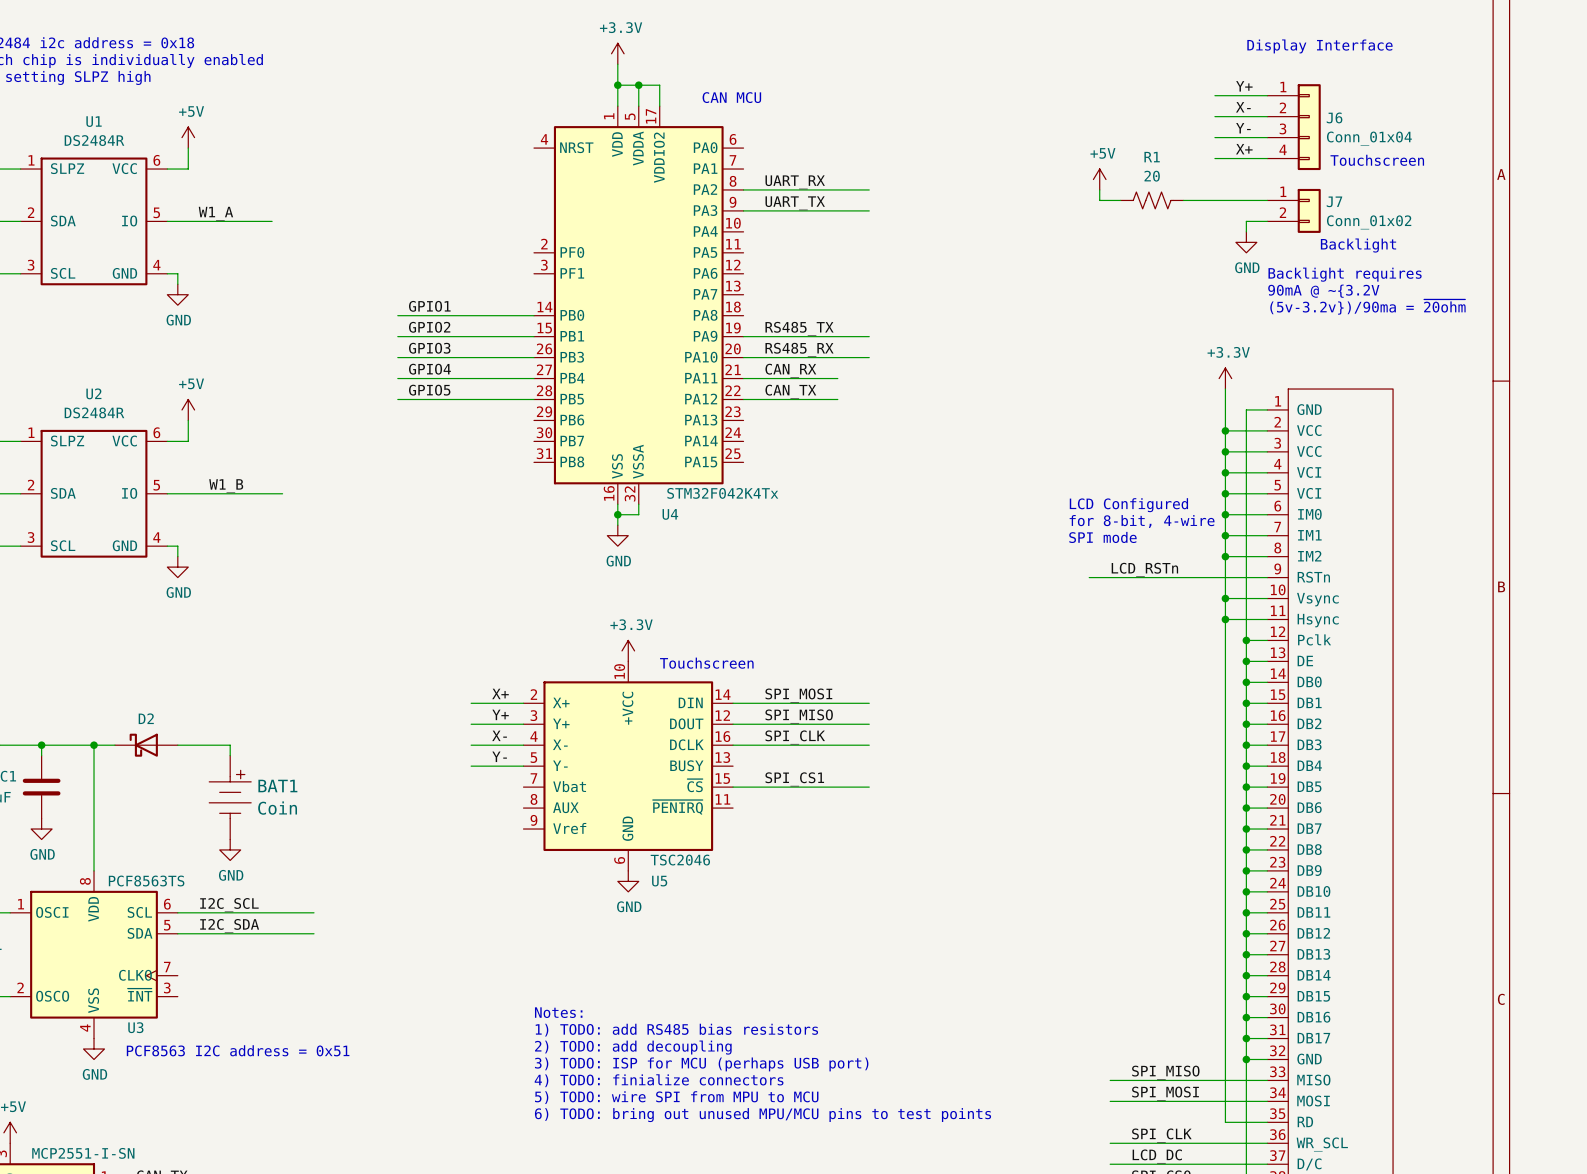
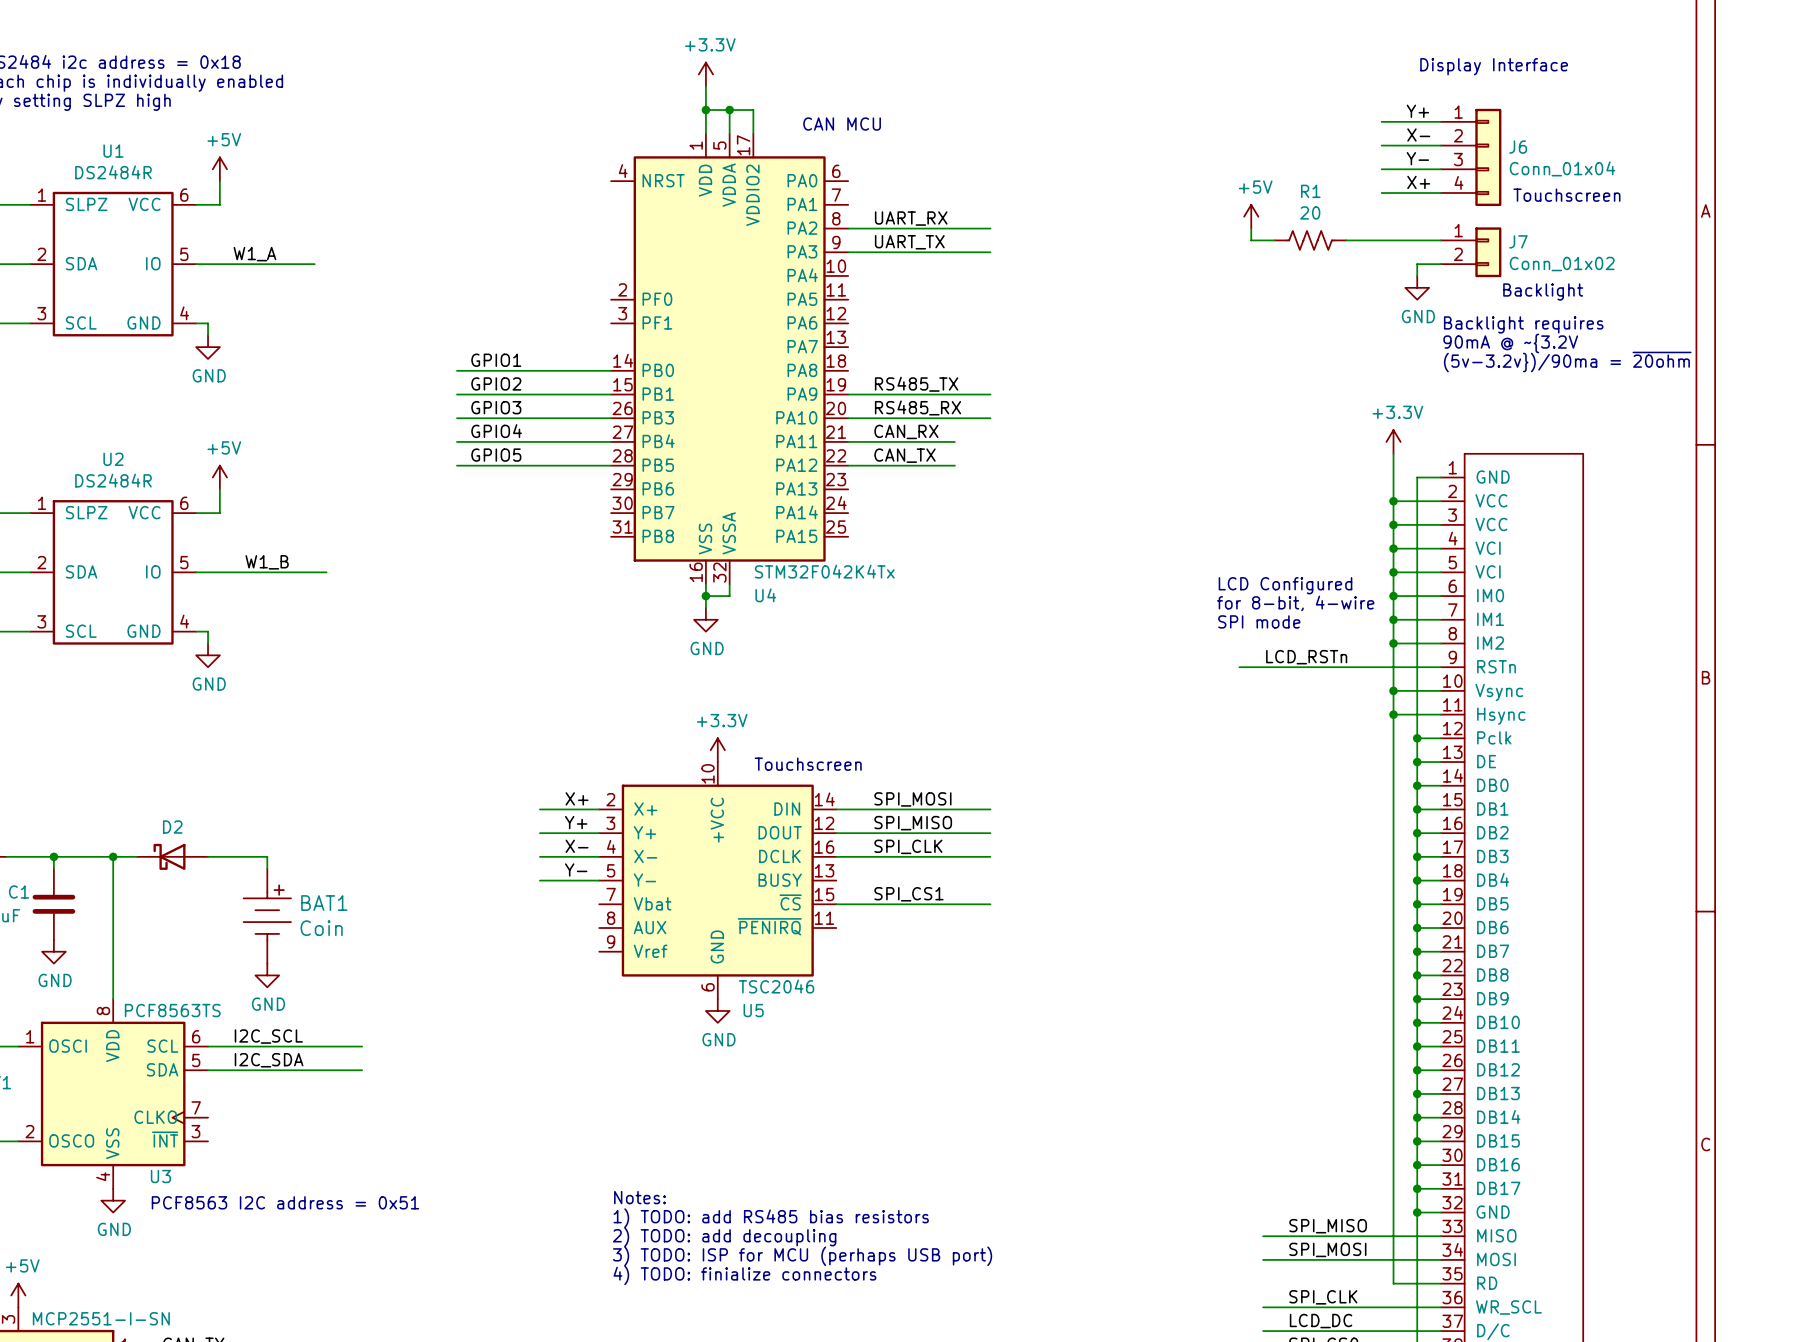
text: Notes: (558, 1012) -> none
text: 1) TODO: add RS485 bias resistors (676, 1030) -> none
text: 2) TODO: add decoupling (633, 1047) -> Notes: (639, 1197)
text: 3) TODO: ISP for MCU (perhaps USB port) (701, 1064) -> 1) TODO: add RS485 bias resistors (771, 1218)
text: 4) TODO: finialize connectors (659, 1080) -> 2) TODO: add decoupling (724, 1237)
text: 5) TODO: wire SPI from MPU to MCU (676, 1097) -> 3) TODO: ISP for MCU (perhaps USB port) (802, 1256)
text: 6) TODO: bring out unused MPU/MCU pins to test points (763, 1115) -> 4) TODO: finialize connectors (744, 1275)

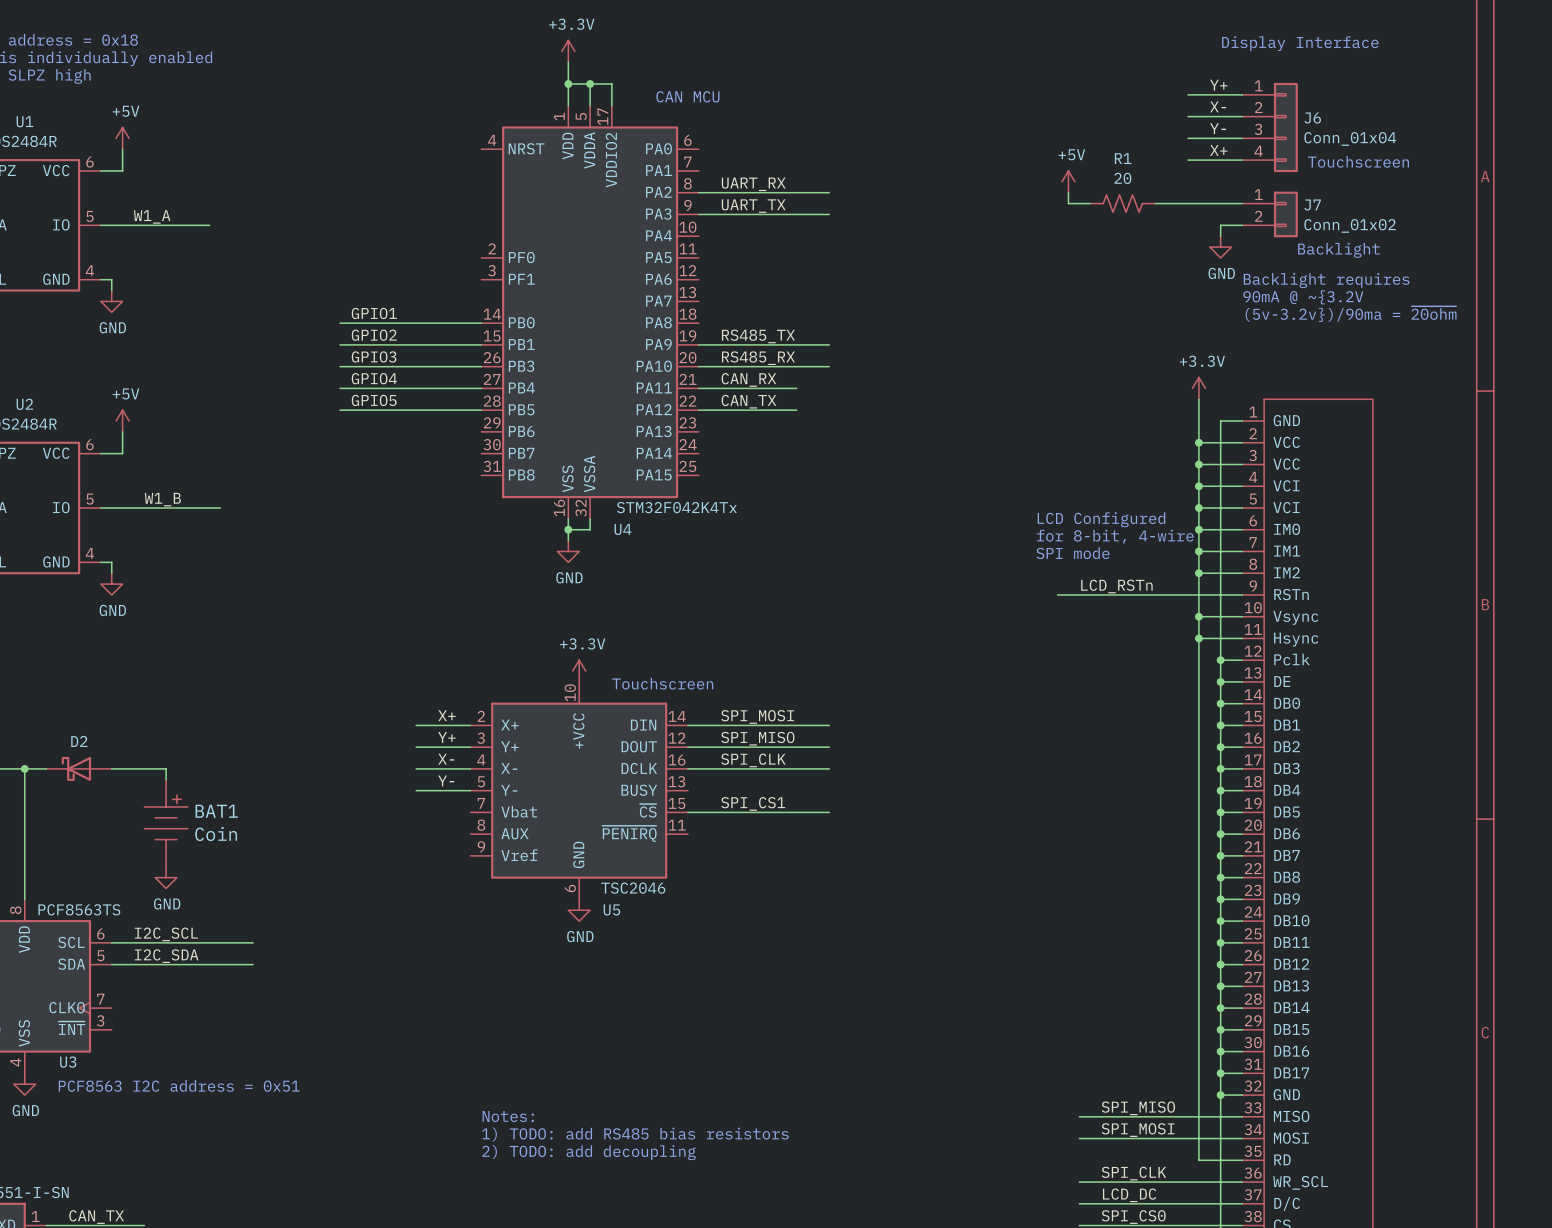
text: Notes: (639, 1197) -> none
text: 1) TODO: add RS485 bias resistors (771, 1218) -> none
text: 2) TODO: add decoupling (724, 1237) -> Notes: (508, 1116)
text: 3) TODO: ISP for MCU (perhaps USB port) (802, 1256) -> 1) TODO: add RS485 bias resistors (635, 1134)
text: 4) TODO: finialize connectors (744, 1275) -> 2) TODO: add decoupling (589, 1152)

